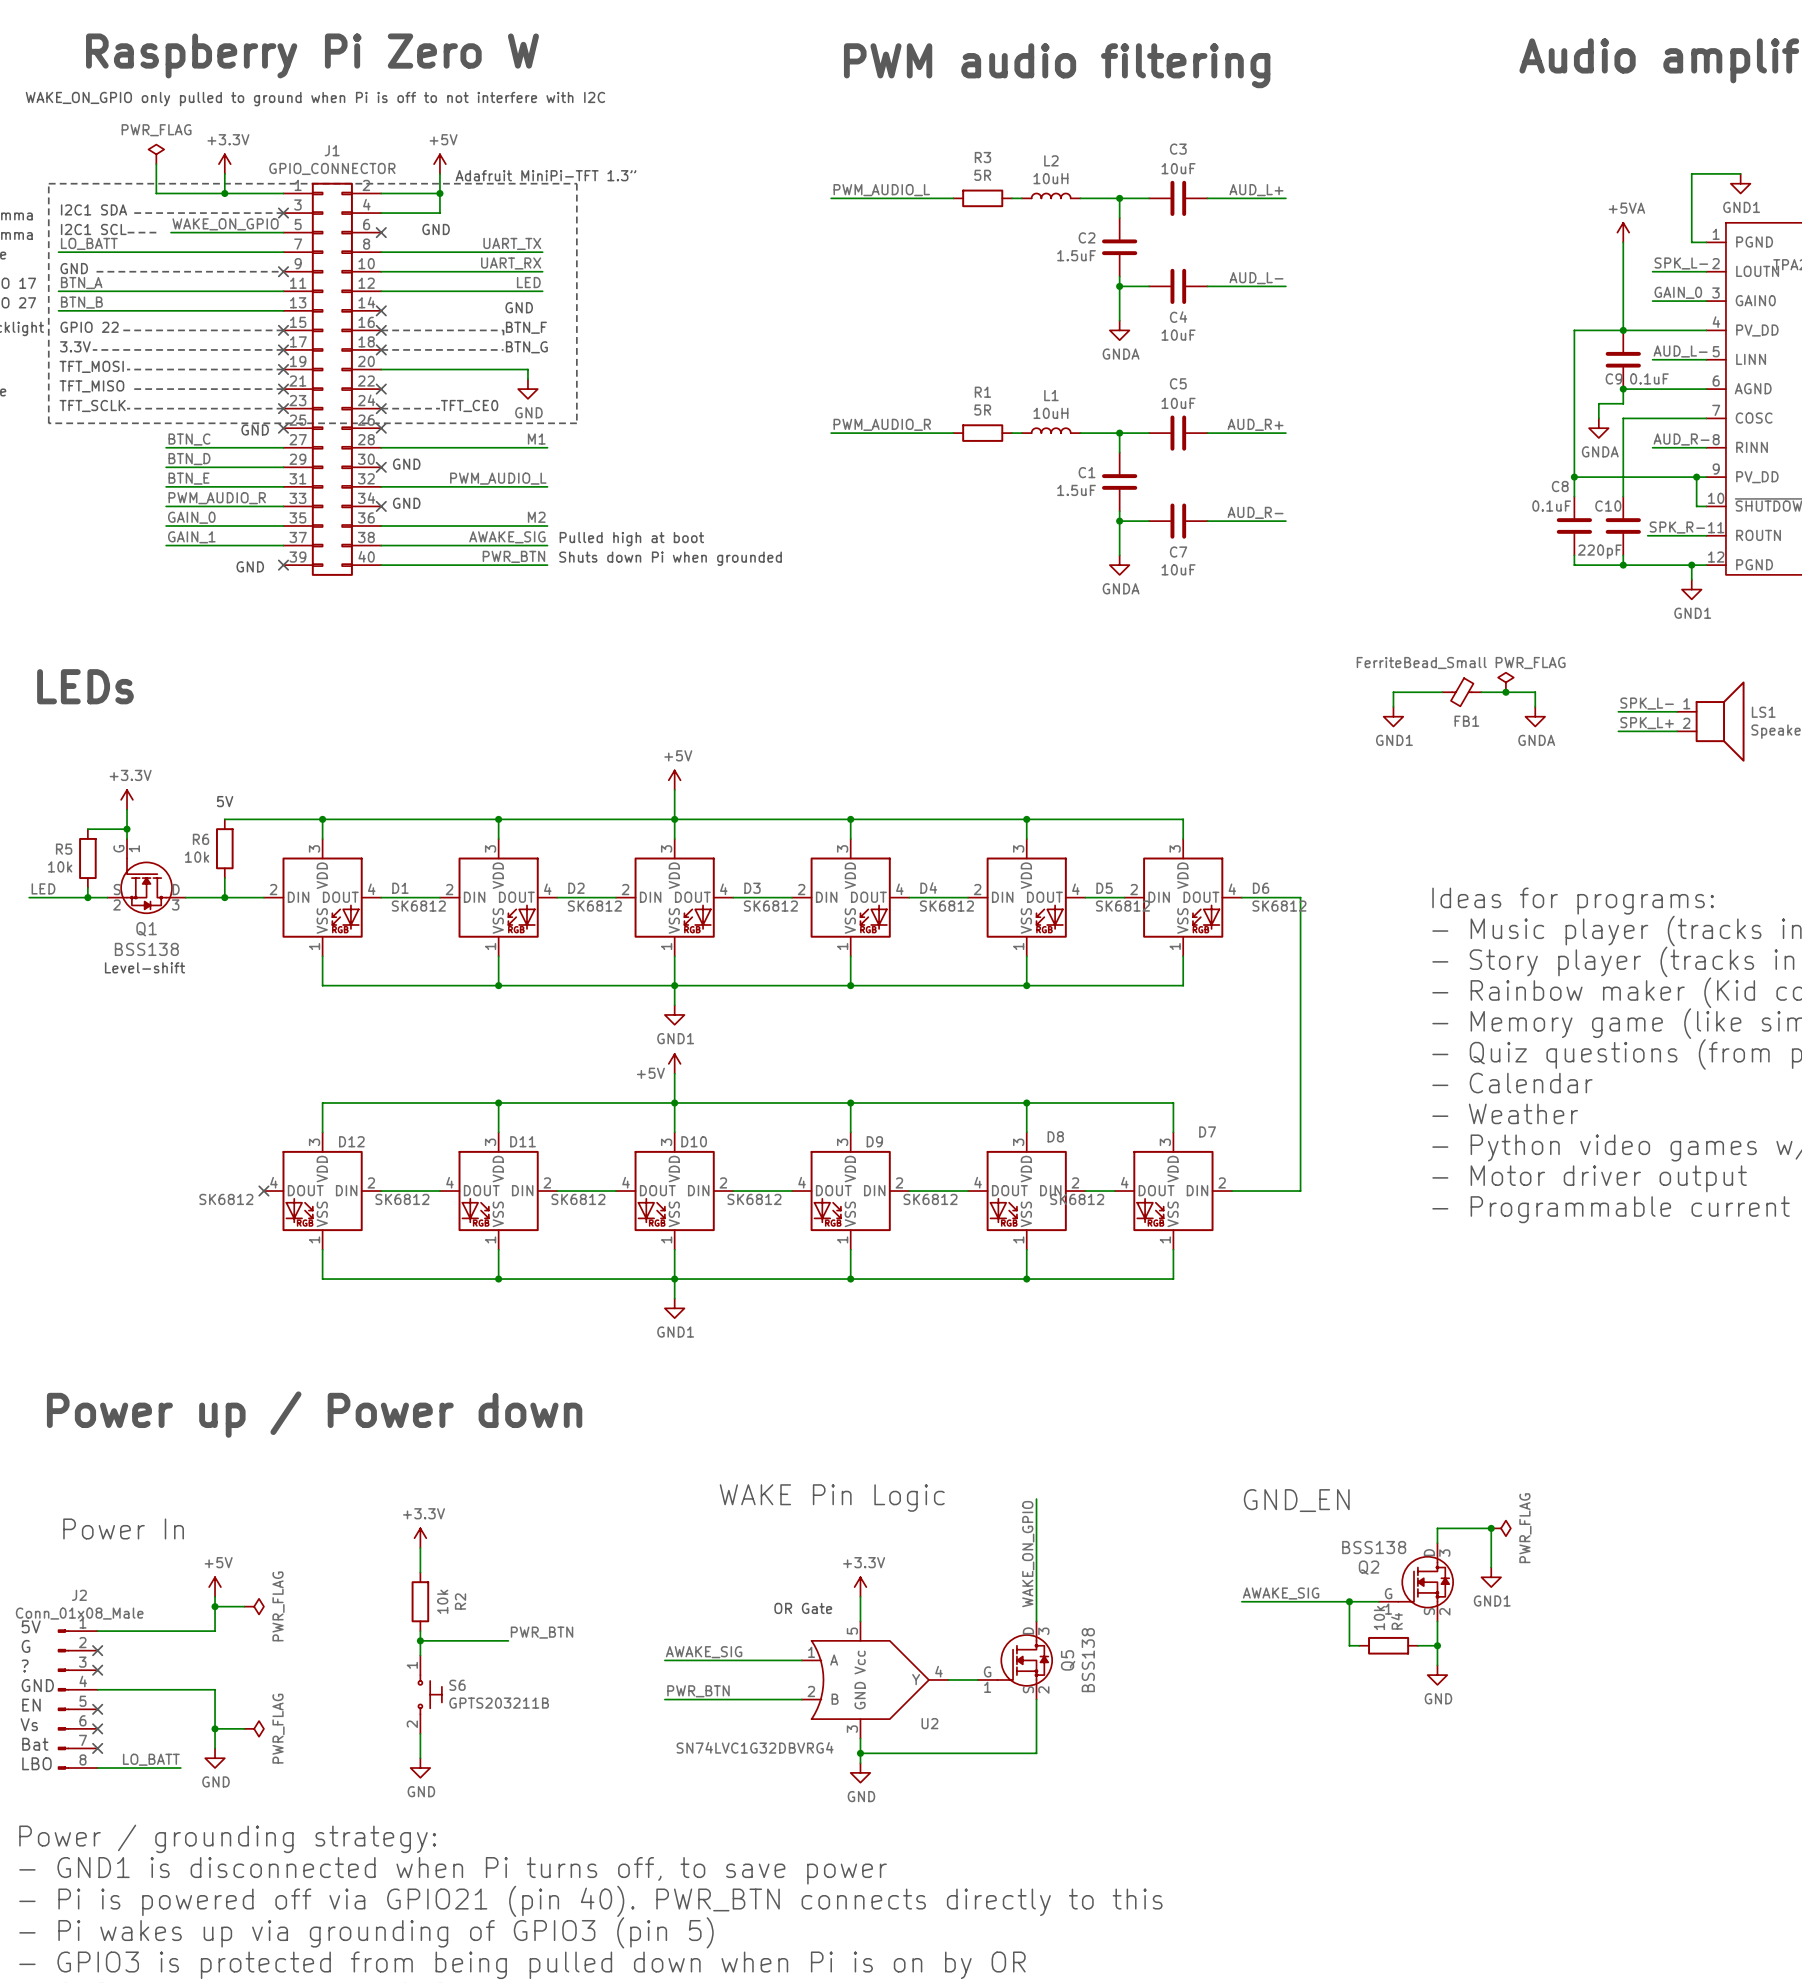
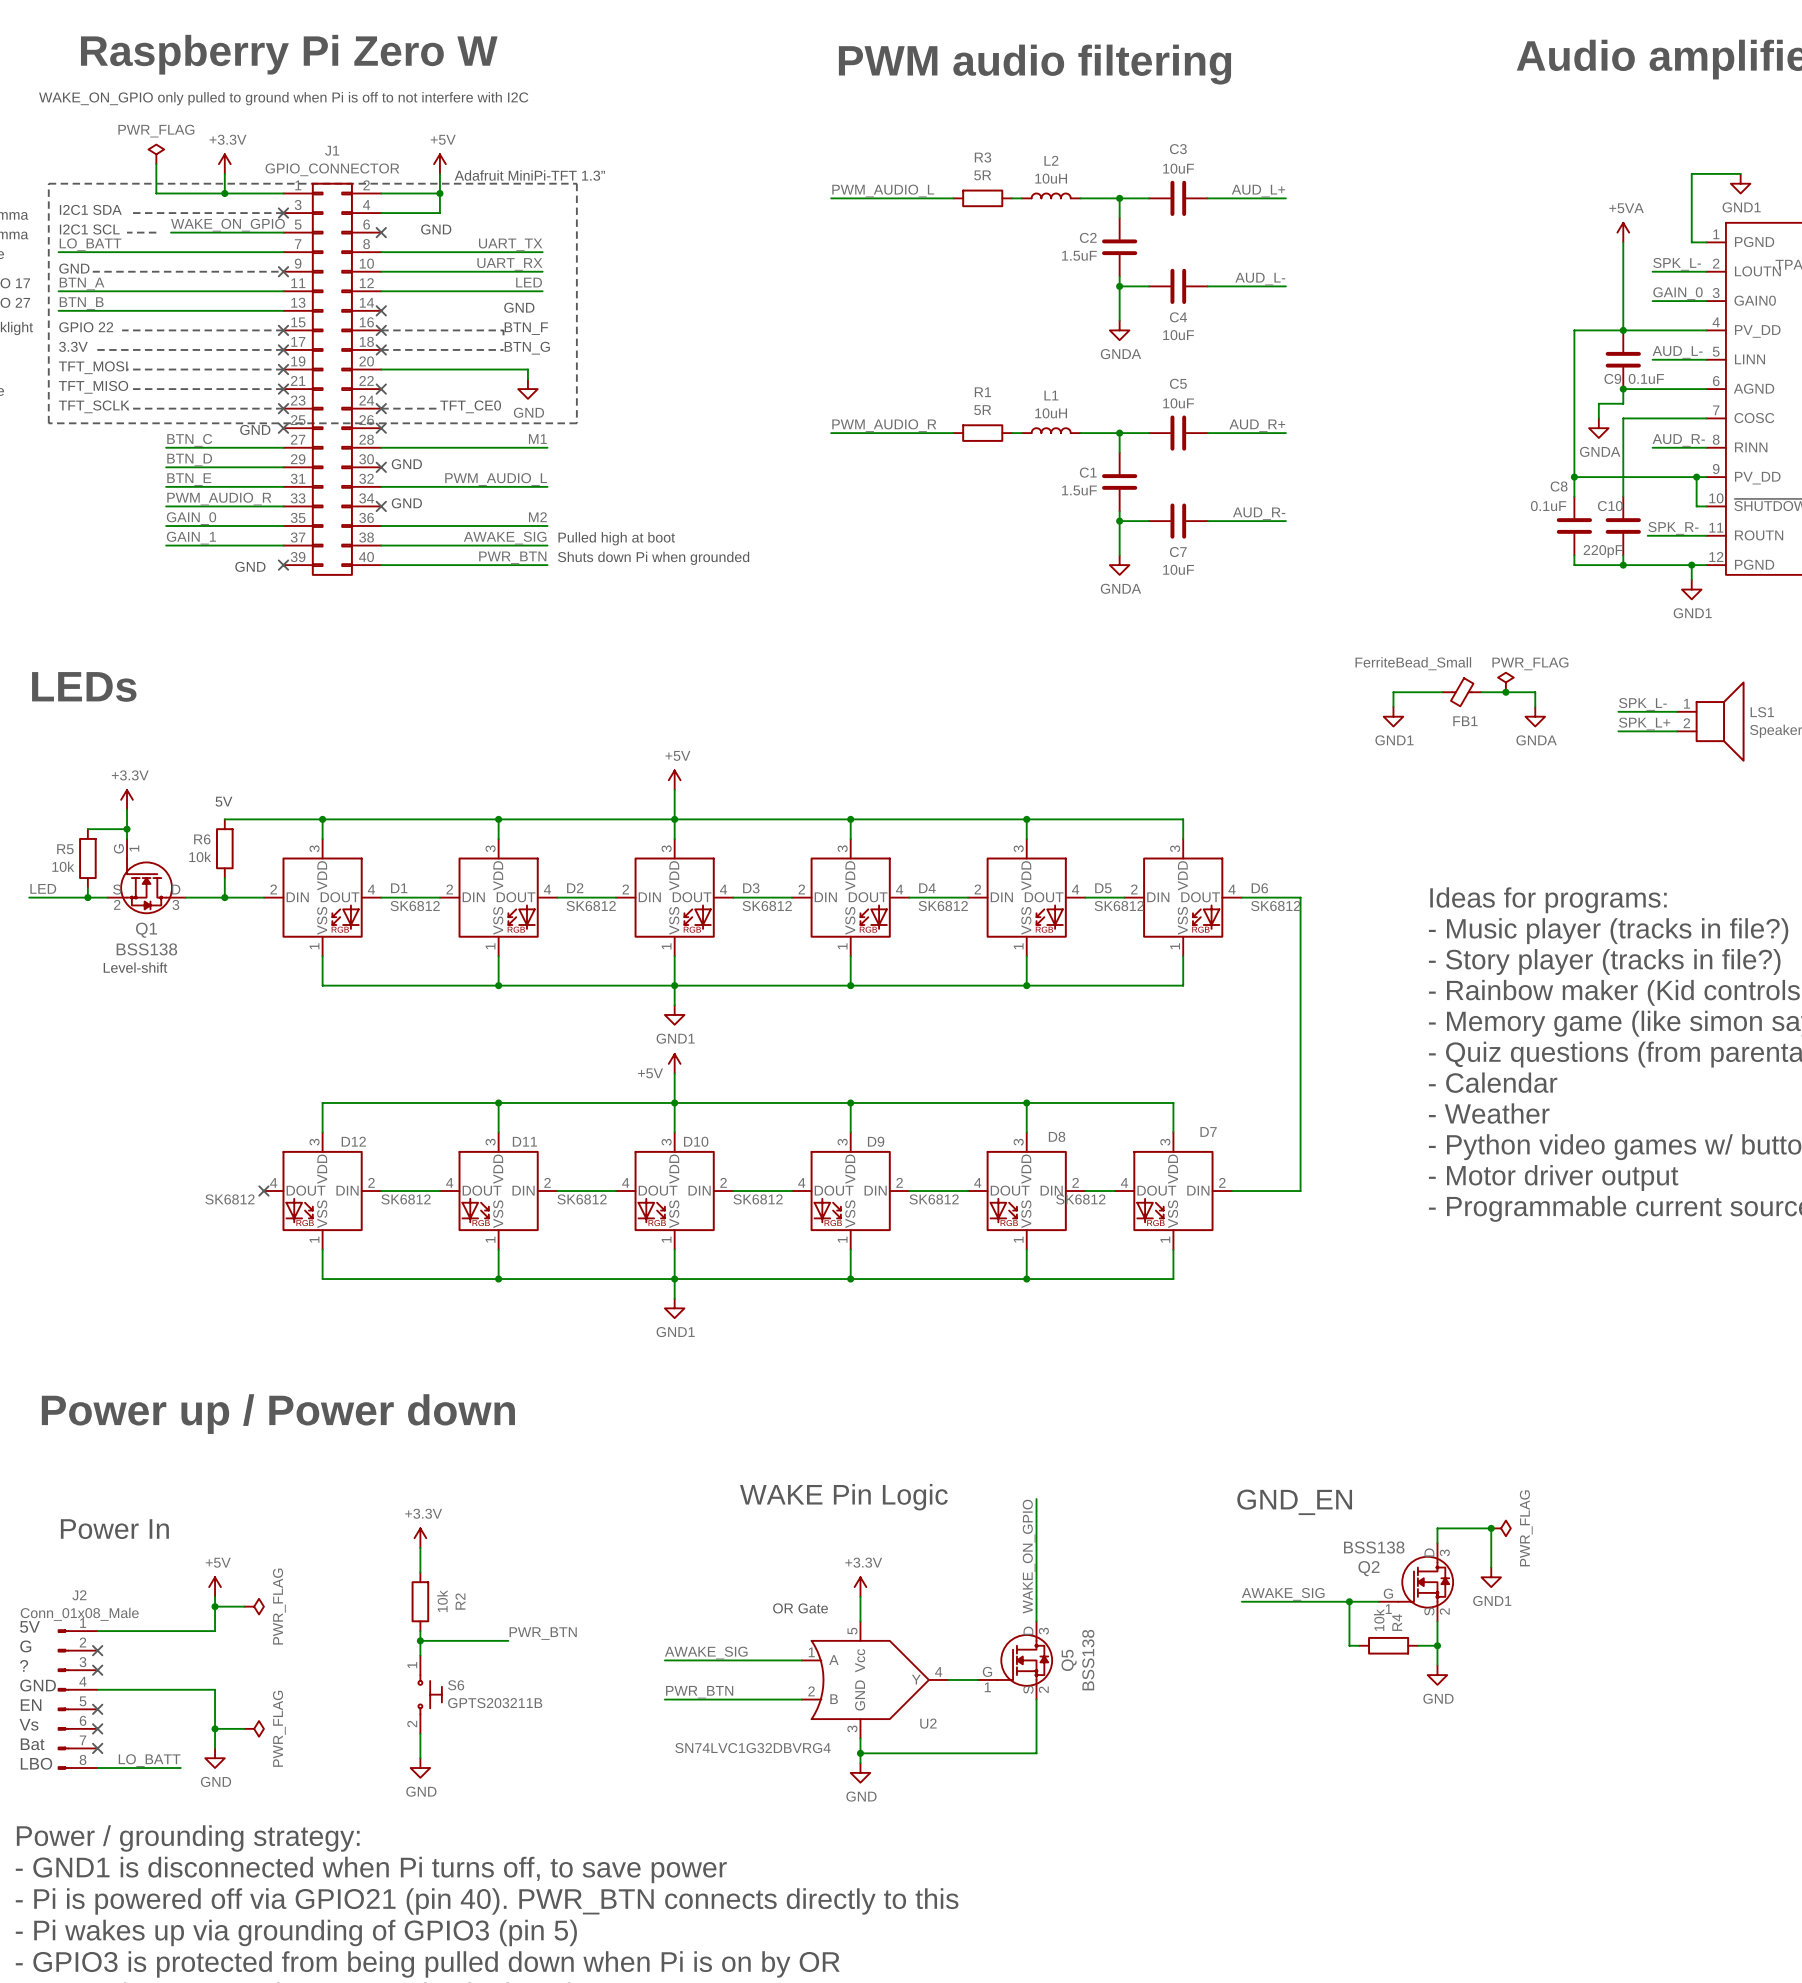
text position: WAKE_ON_GPIO only pulled to ground when Pi is off to not interfere with I2C (315, 99) -> WAKE_ON_GPIO only pulled to ground when Pi is off to not interfere with I2C (283, 98)

